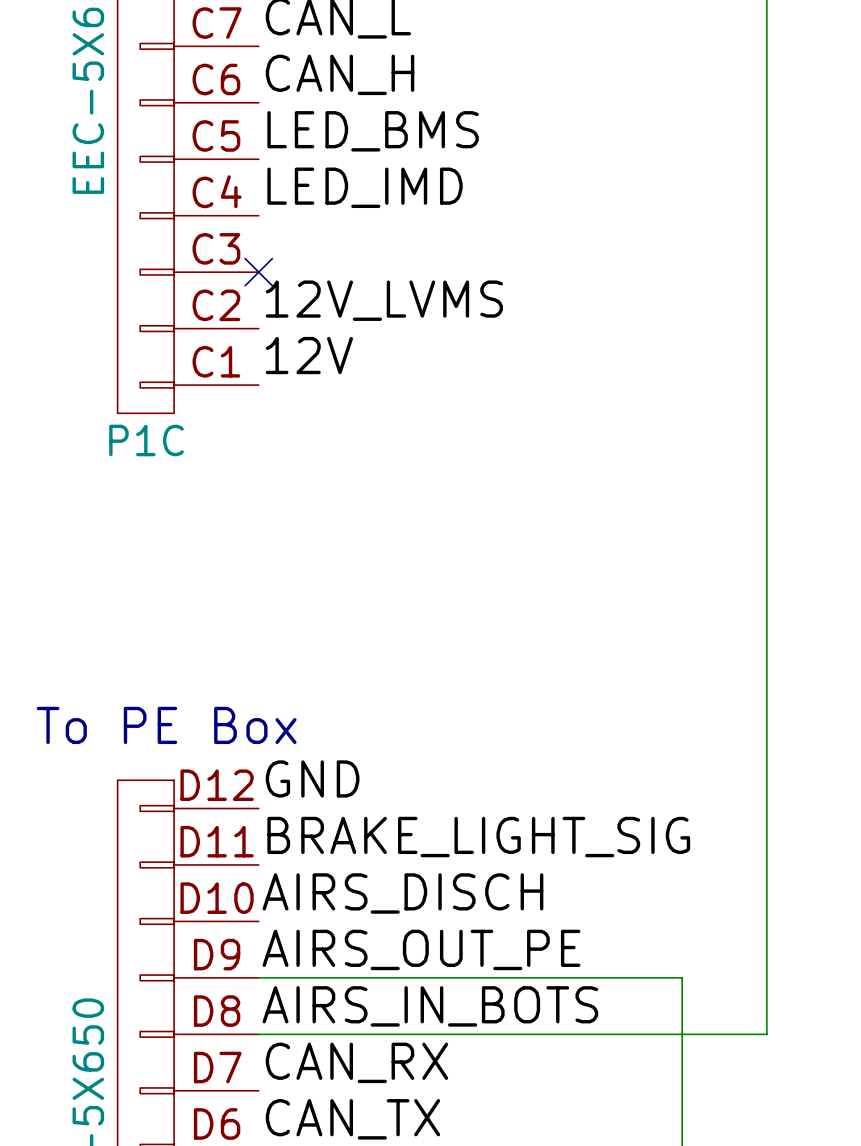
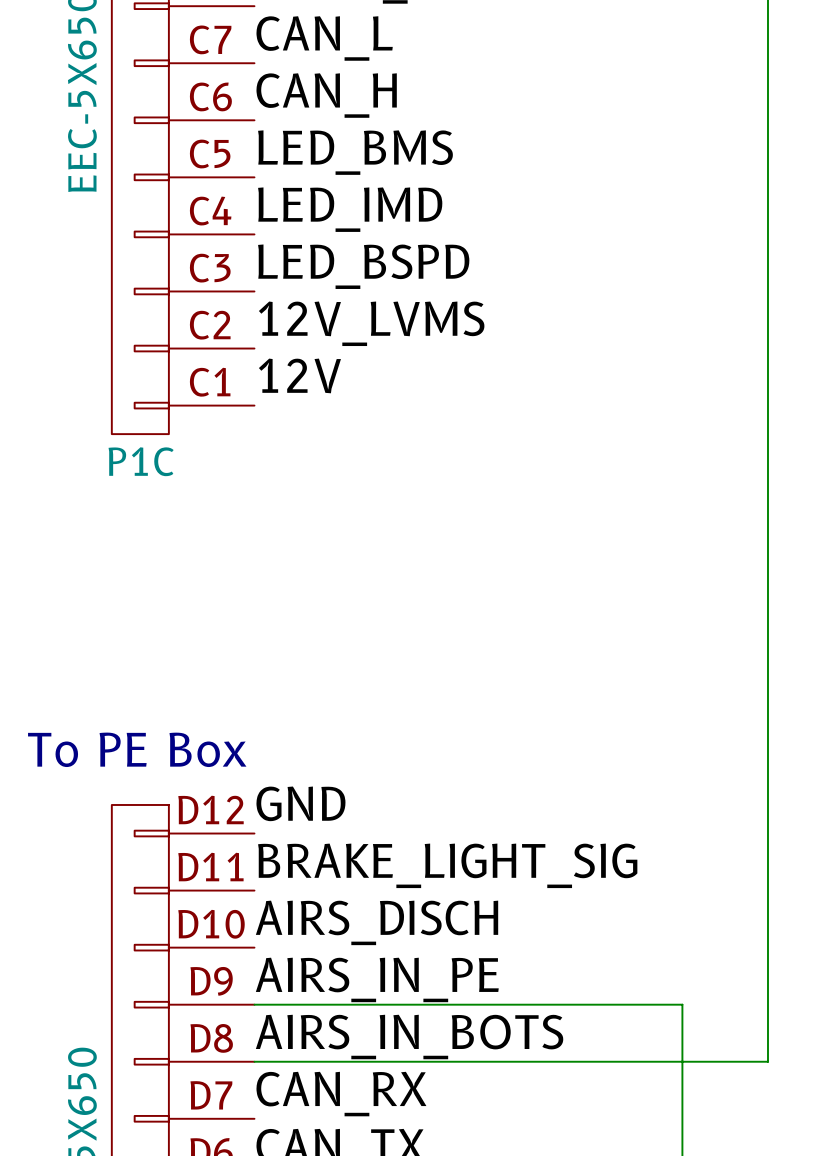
label: none -> LED_BSPD (363, 266)
no-connect mark: (258, 272) -> none
label: AIRS_OUT_PE (421, 949) -> AIRS_IN_PE (377, 979)

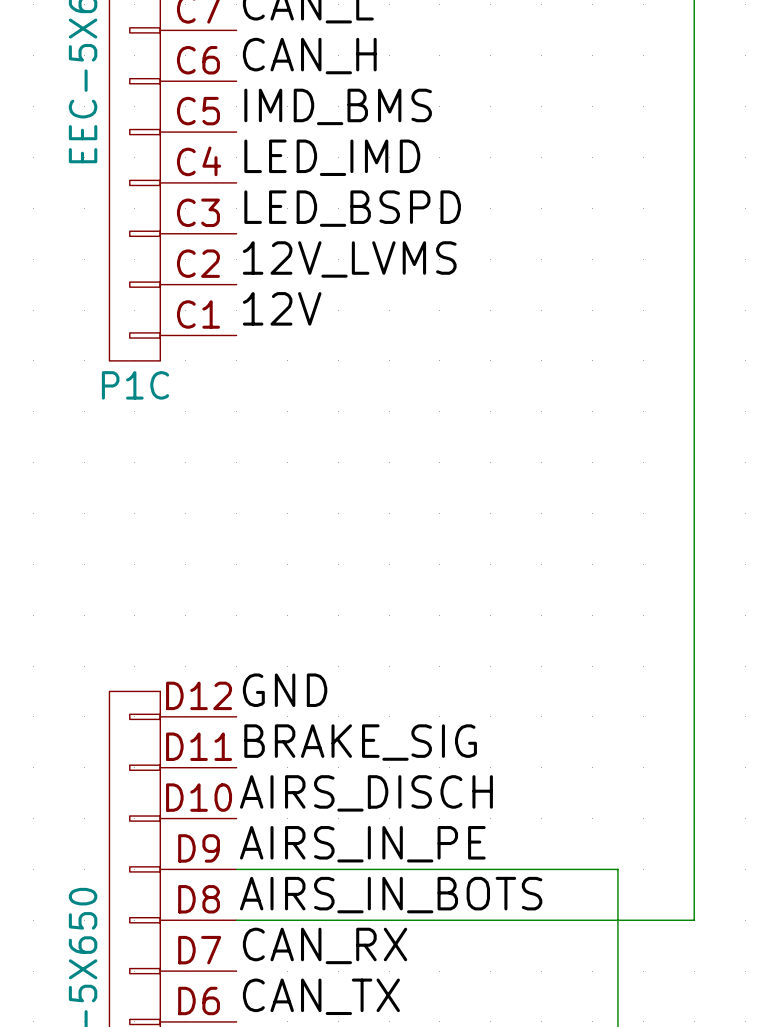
label: LED_BMS (355, 152) -> IMD_BMS (338, 106)
text: To PE Box (137, 749) -> none
label: BRAKE_LIGHT_SIG (447, 865) -> BRAKE_SIG (360, 742)

